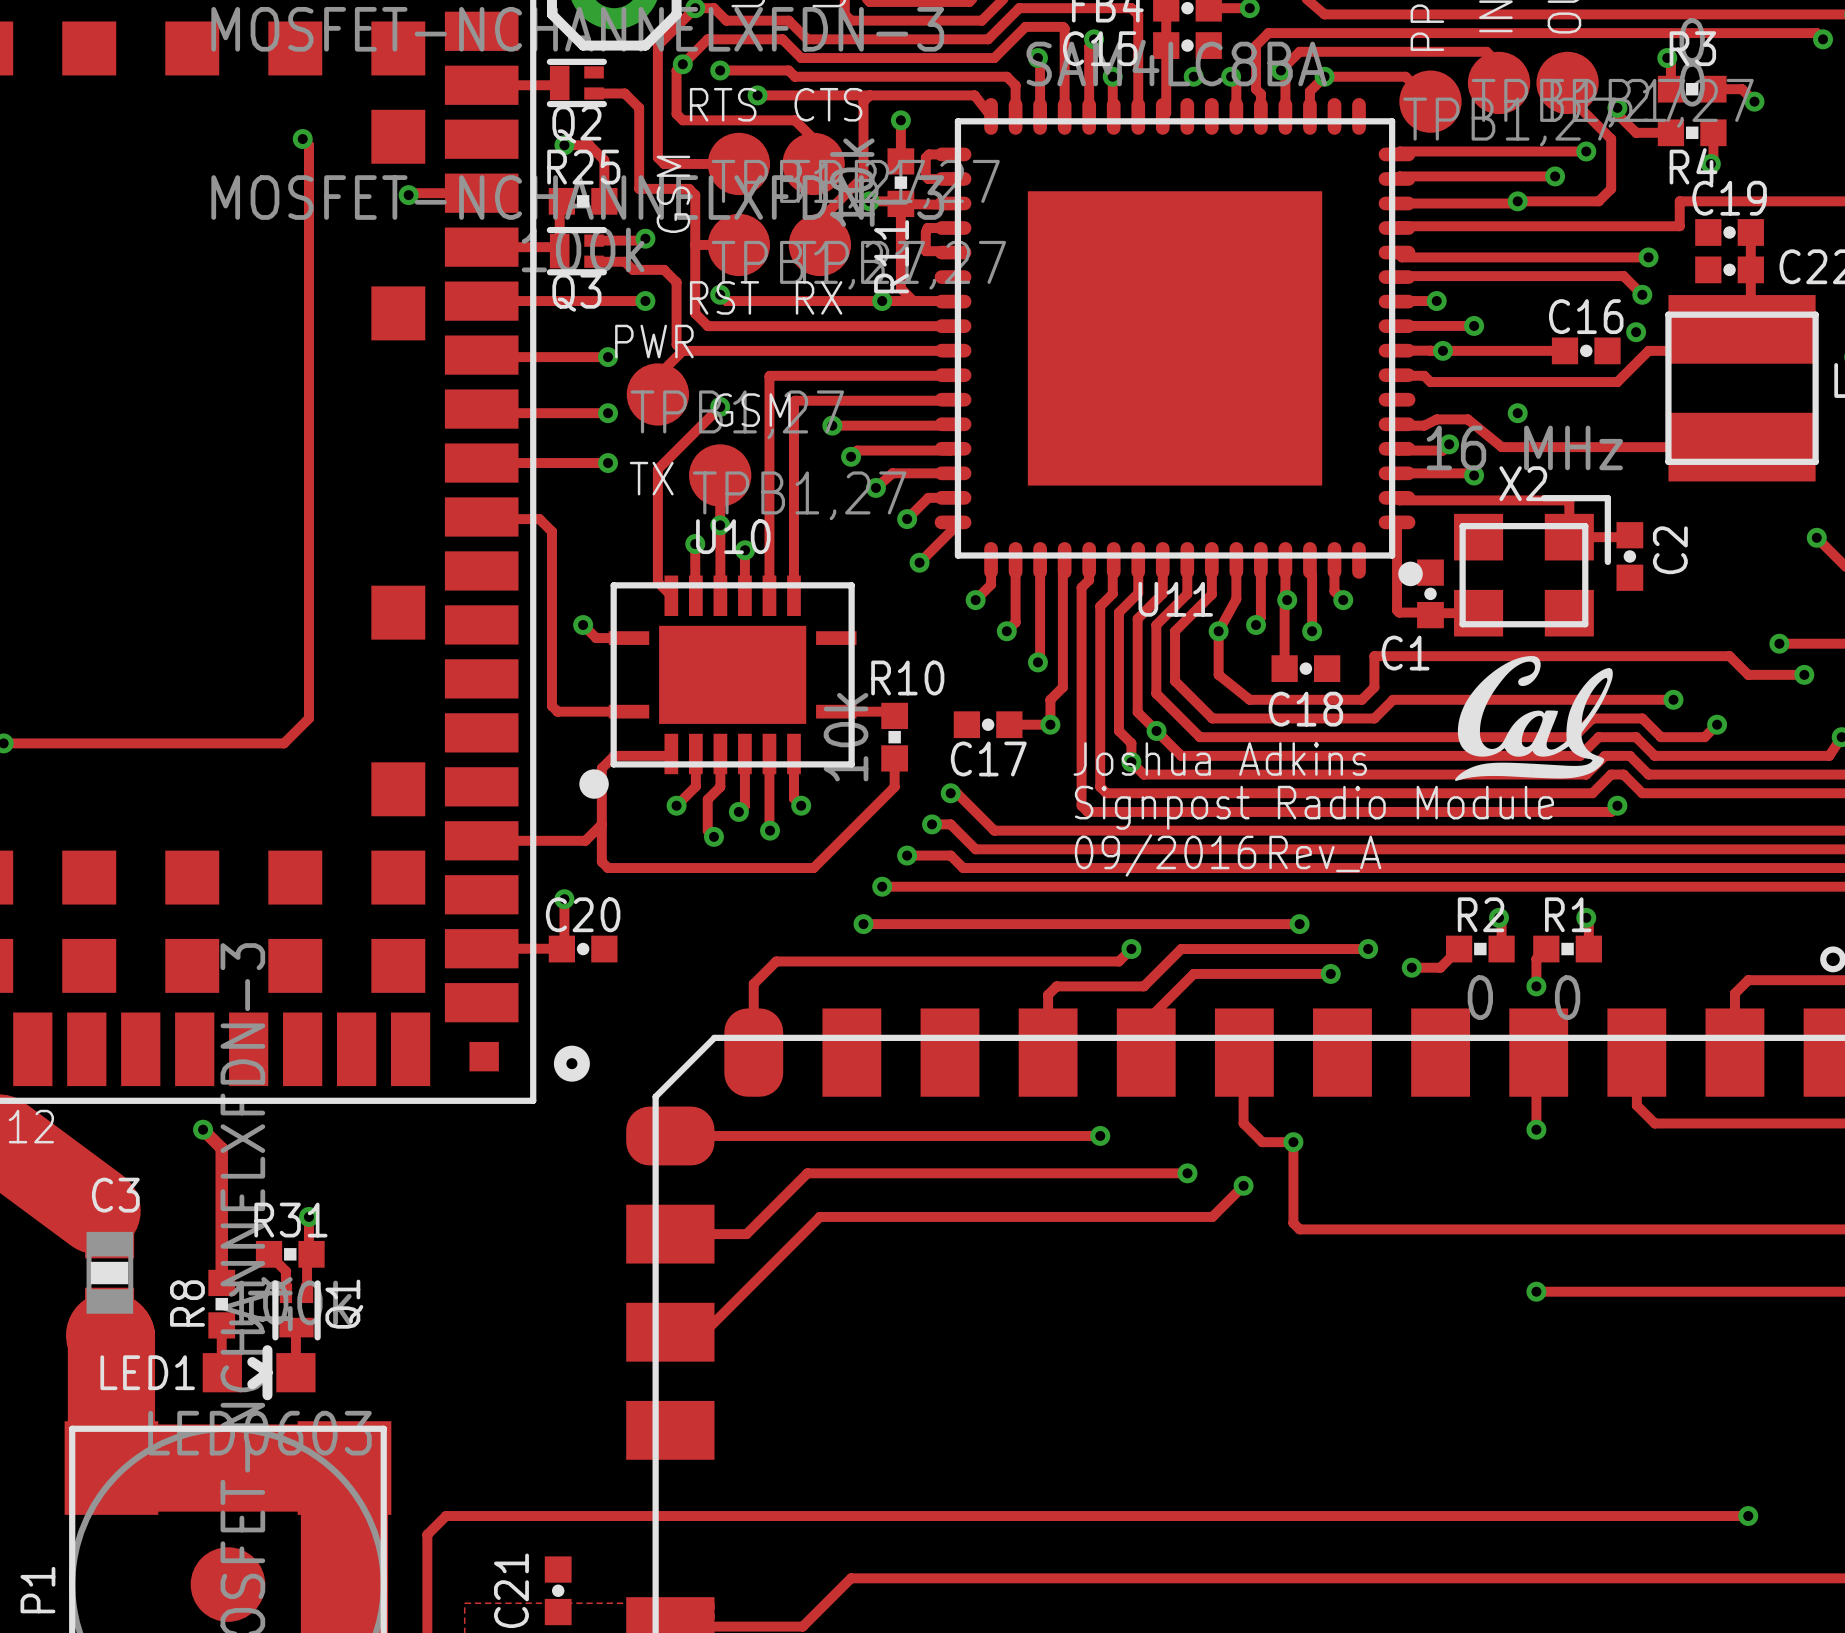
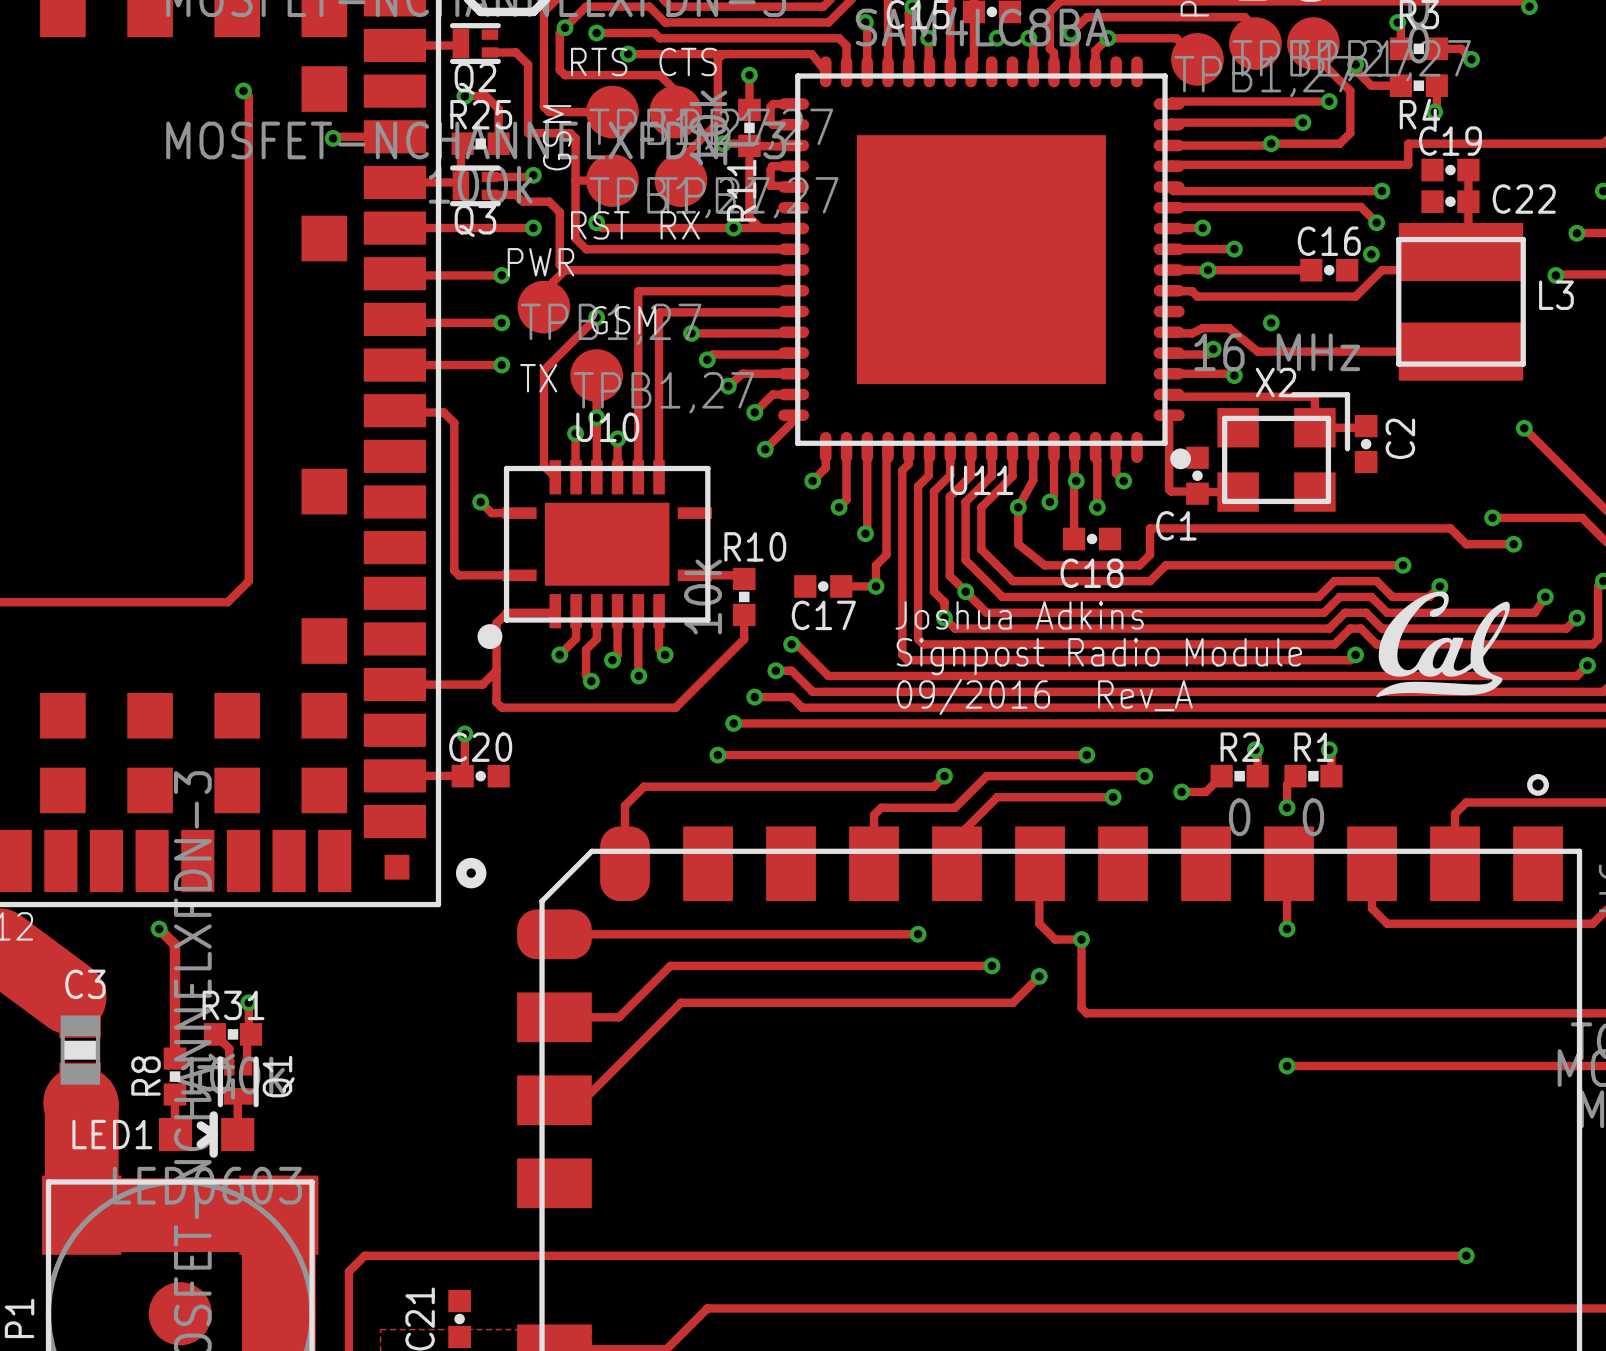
drawing position: (1533, 718) -> (1443, 644)
text position: Rev_A (1325, 853) -> Rev_A (1145, 695)

